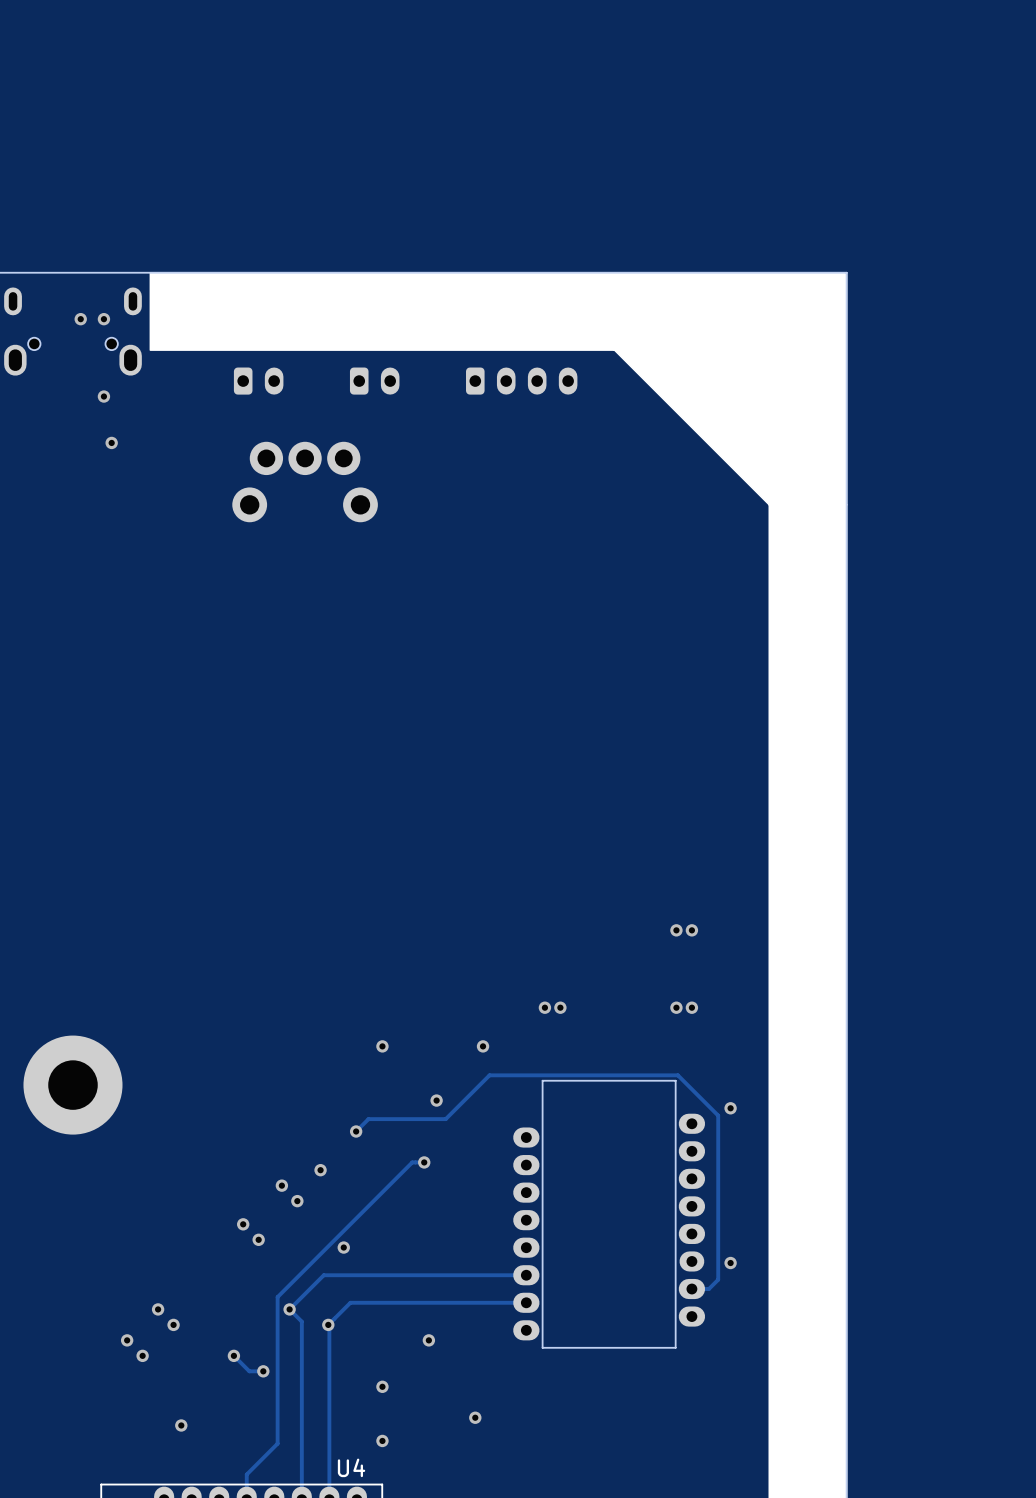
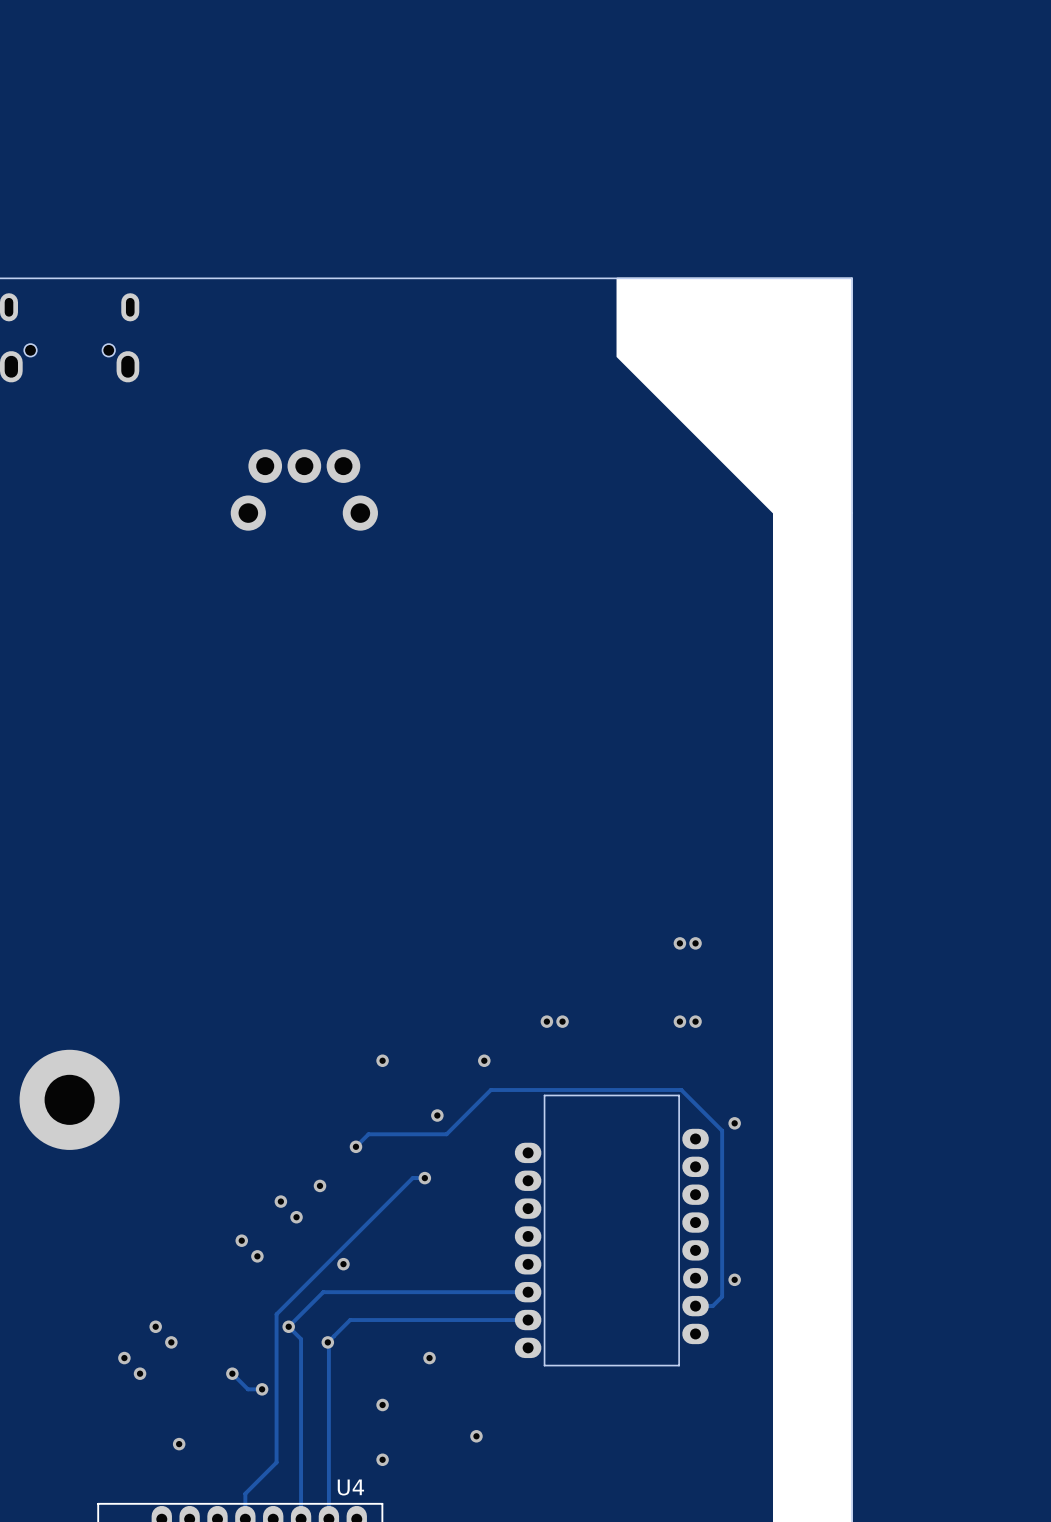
drawing: [149, 271, 616, 351] -> none
via: (80, 319) -> none
via: (103, 319) -> none
part: (258, 381) -> none
part: (374, 381) -> none
part: (521, 381) -> none
via: (103, 396) -> none
via: (111, 442) -> none

